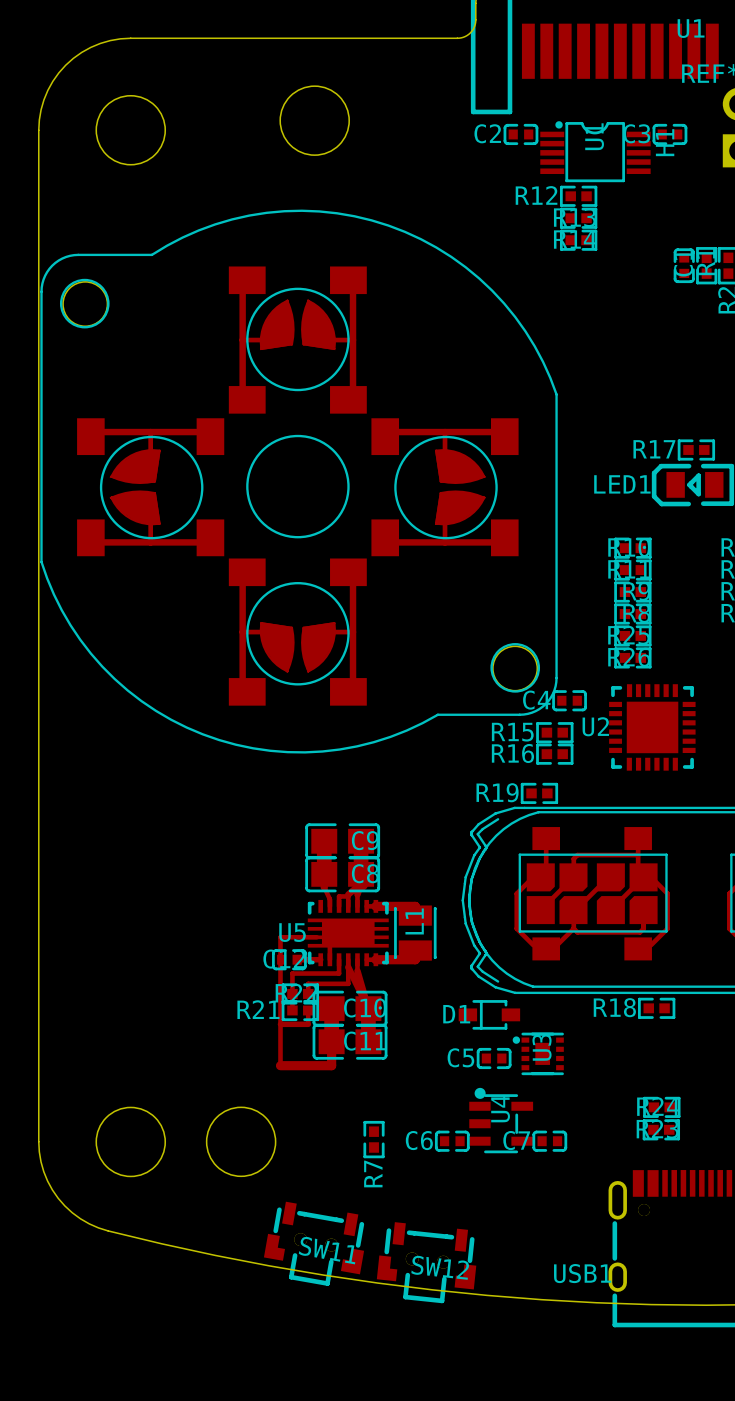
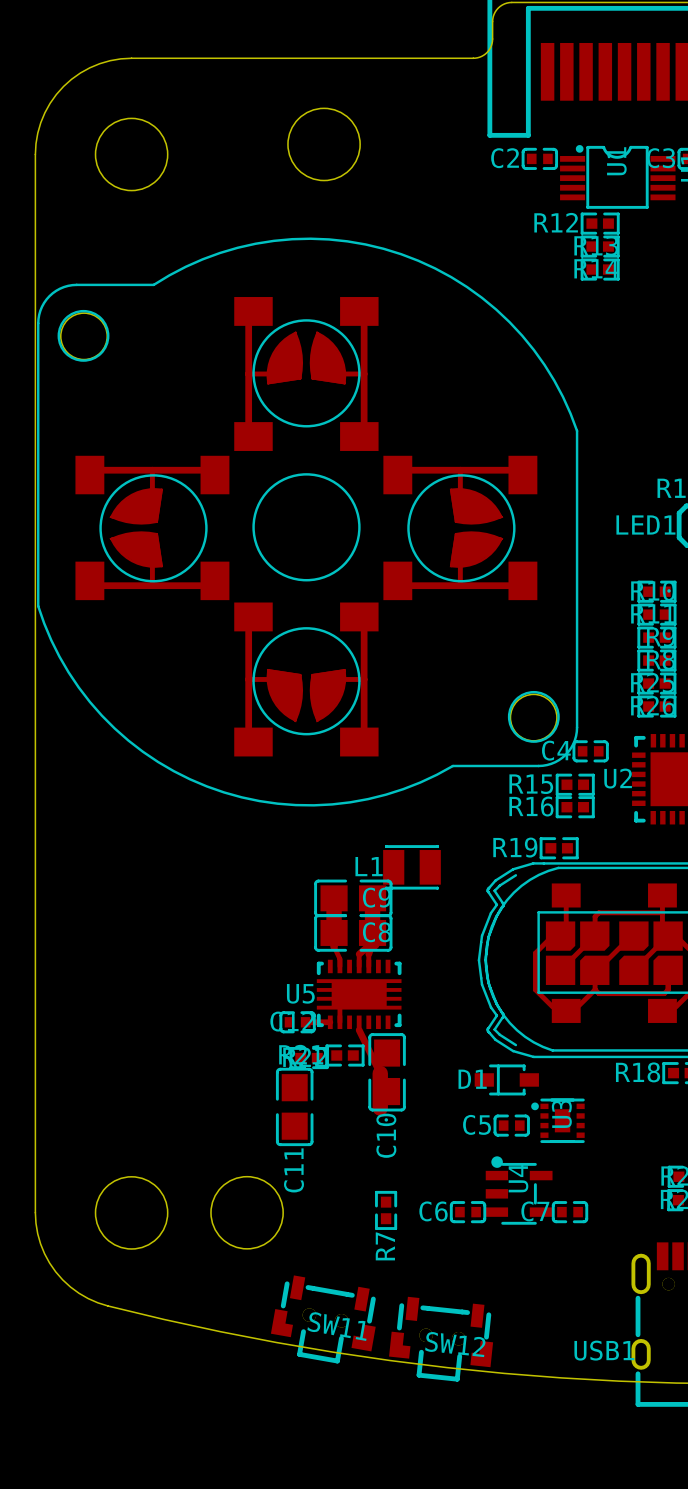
track: (348, 896) (339, 896) (339, 906) -> none
track: (366, 906) (415, 906) (415, 915) -> none
L1 name position: L1 (414, 921) -> L1 (369, 866)
L1 rotation: 0° (415, 933) -> 90° clockwise (411, 867)
L1 position: (415, 933) -> (411, 867)
track: (316, 937) (280, 937) (280, 1065) (331, 1065) (331, 1008) -> none
track: (415, 950) (415, 959) (366, 959) -> none
track: (339, 959) (339, 973) (292, 973) (292, 1010) -> none
track: (348, 959) (348, 983) (308, 983) (308, 993) -> none
track: (357, 959) (357, 970) (368, 1008) -> none
C10 name position: C10 (365, 1007) -> C10 (386, 1135)
C10 rotation: 0° (350, 1008) -> 90° clockwise (387, 1072)
R21 position: (300, 1010) -> (345, 1055)
track: (308, 1010) (308, 1024) (280, 1024) -> none
C11 rotation: 0° (350, 1041) -> 90° clockwise (294, 1106)
C11 position: (350, 1041) -> (294, 1106)
C11 name position: C11 (365, 1041) -> C11 (294, 1170)

